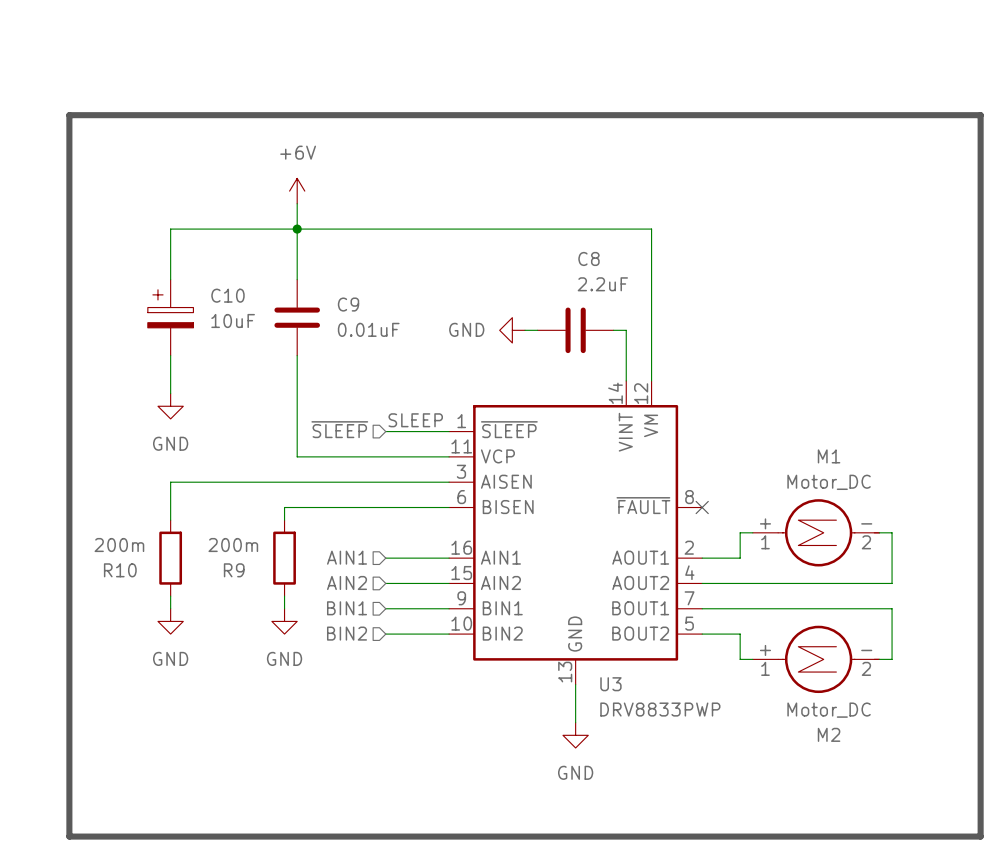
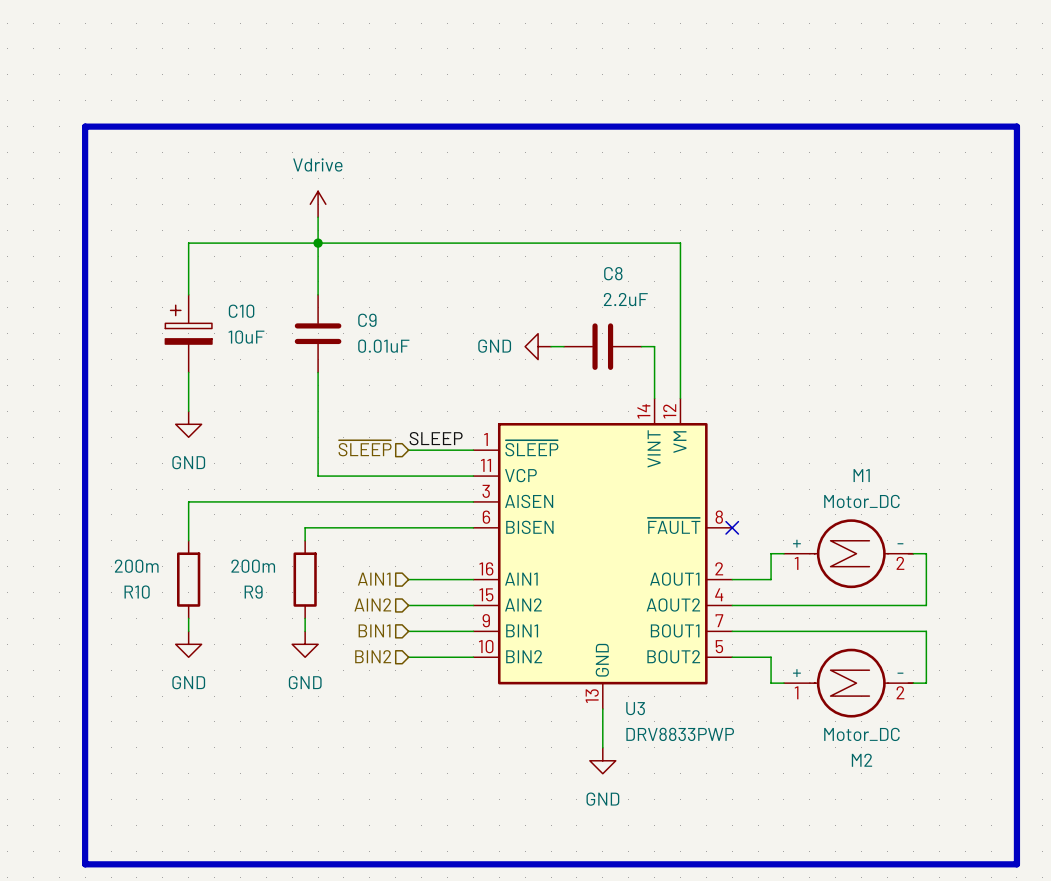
power symbol: +6V (297, 191) -> Vdrive (318, 204)

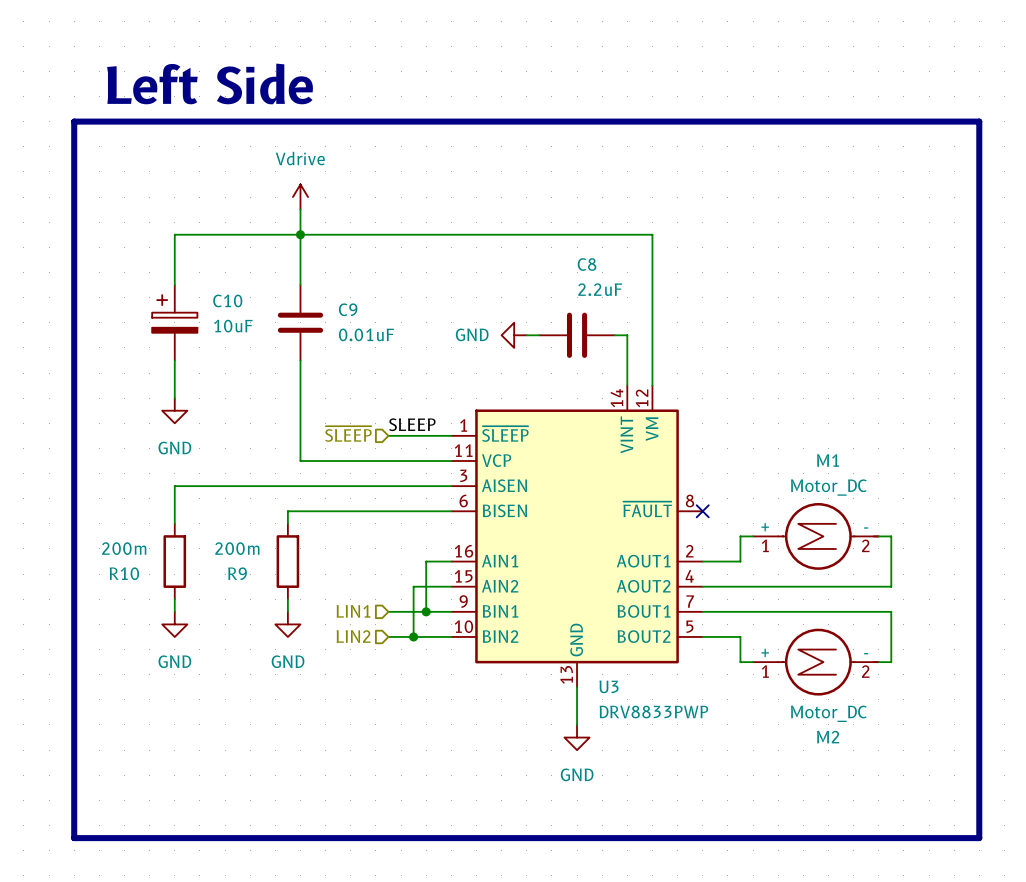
text: none -> Left Side (210, 83)
hierarchical label: AIN1 (374, 579) -> none
wire: (408, 579) (447, 579) -> (426, 611) (426, 561)
hierarchical label: AIN2 (372, 604) -> none
wire: (408, 605) (434, 605) -> (413, 636) (413, 586)
hierarchical label: BIN1 (374, 630) -> LIN1 (353, 611)
junction: none -> (426, 611)
hierarchical label: BIN2 (373, 656) -> LIN2 (353, 636)
junction: none -> (413, 636)

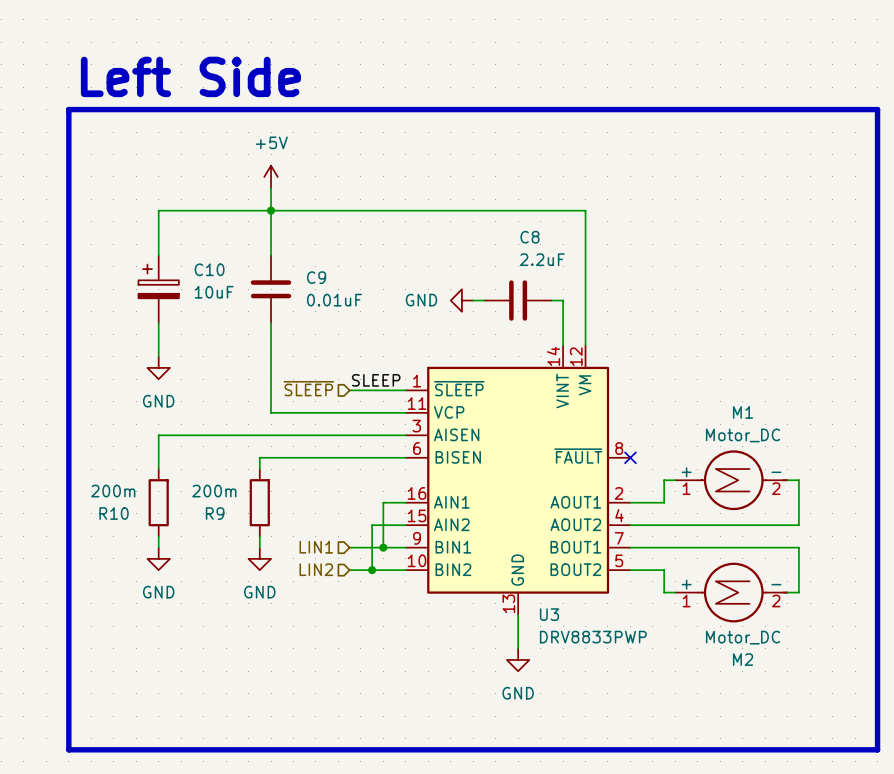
power symbol: Vdrive (300, 197) -> +5V (271, 176)

